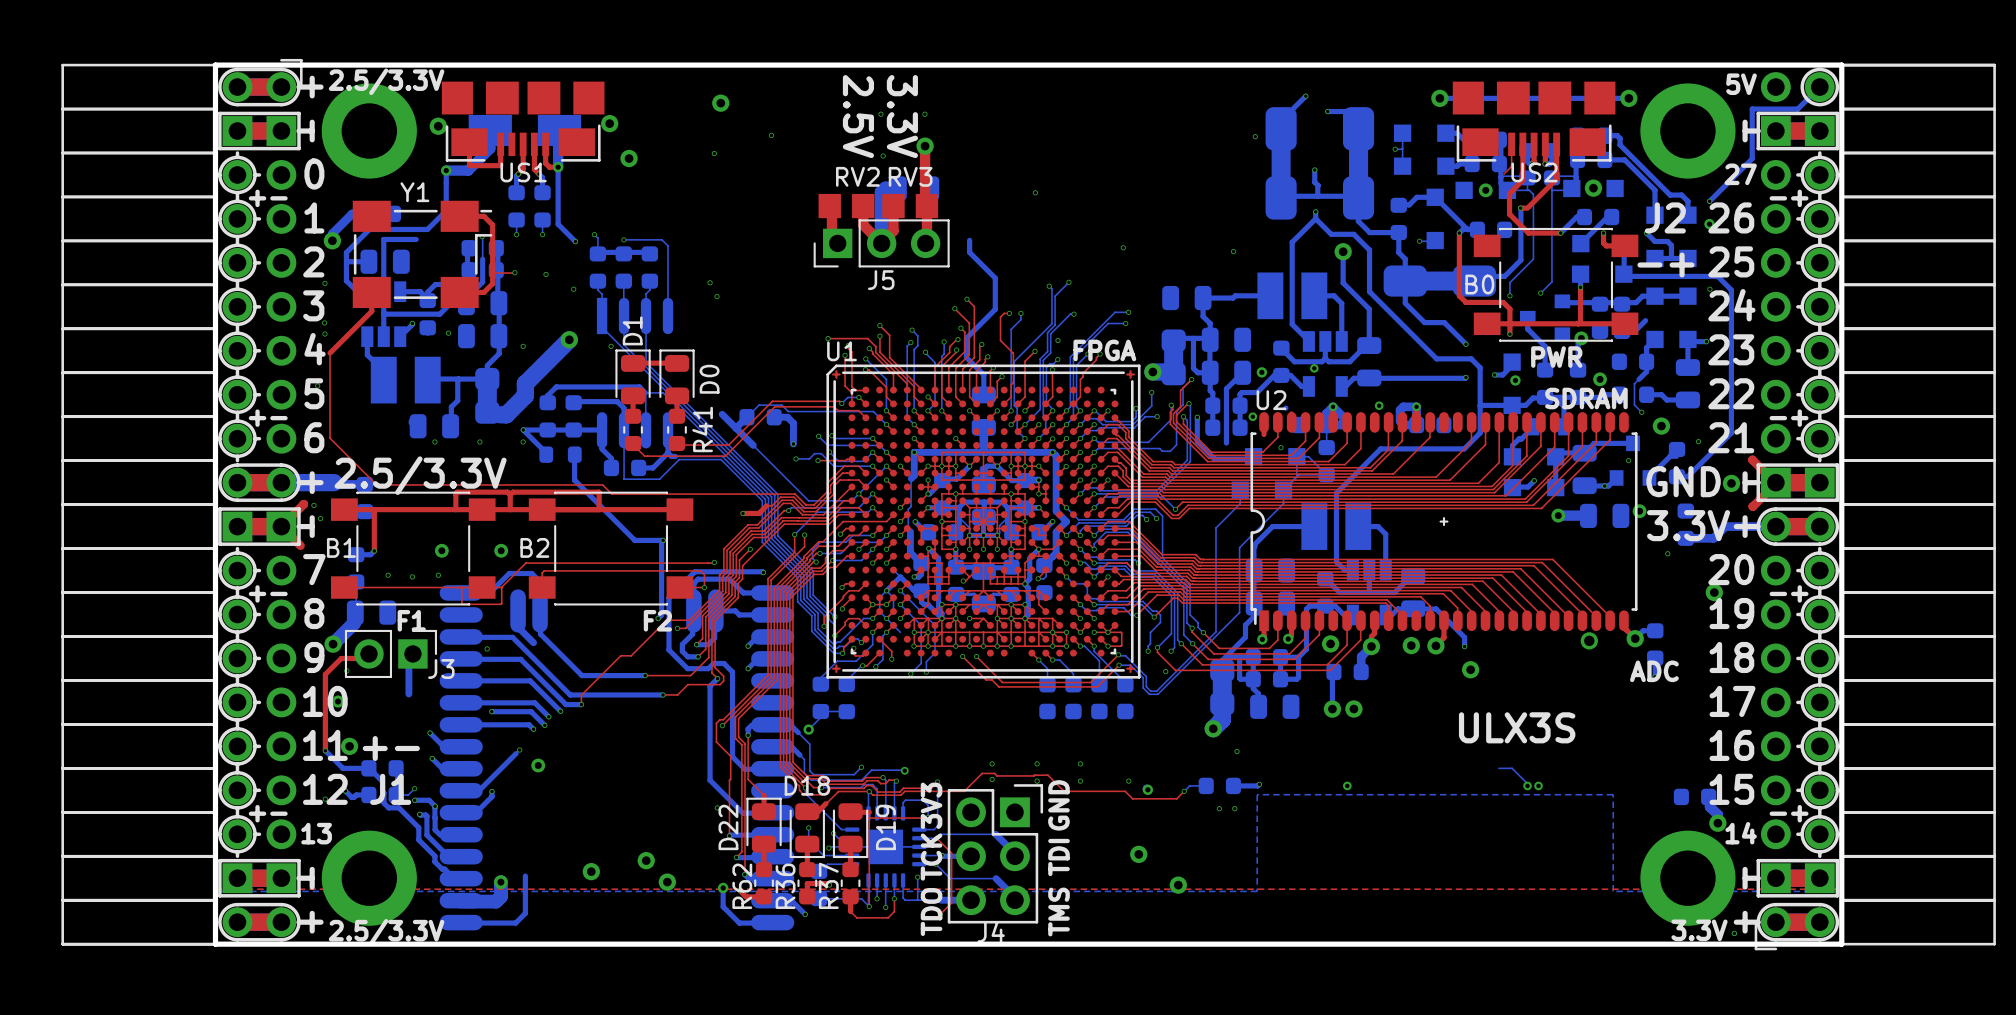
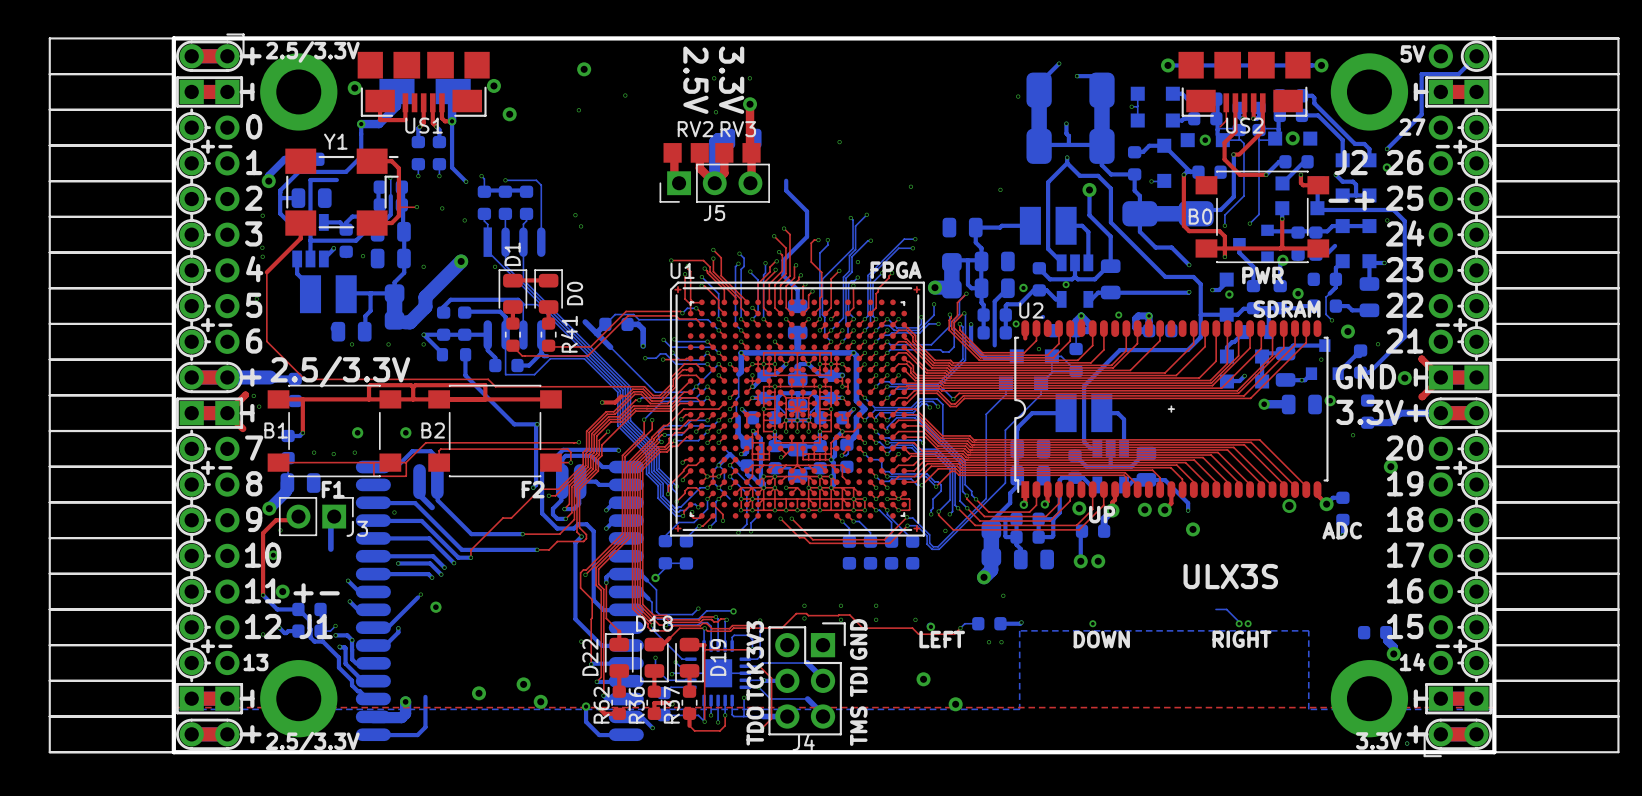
text: none -> UP (1102, 514)
text: none -> LEFT (942, 639)
text: none -> DOWN (1101, 639)
text: none -> RIGHT (1241, 639)

